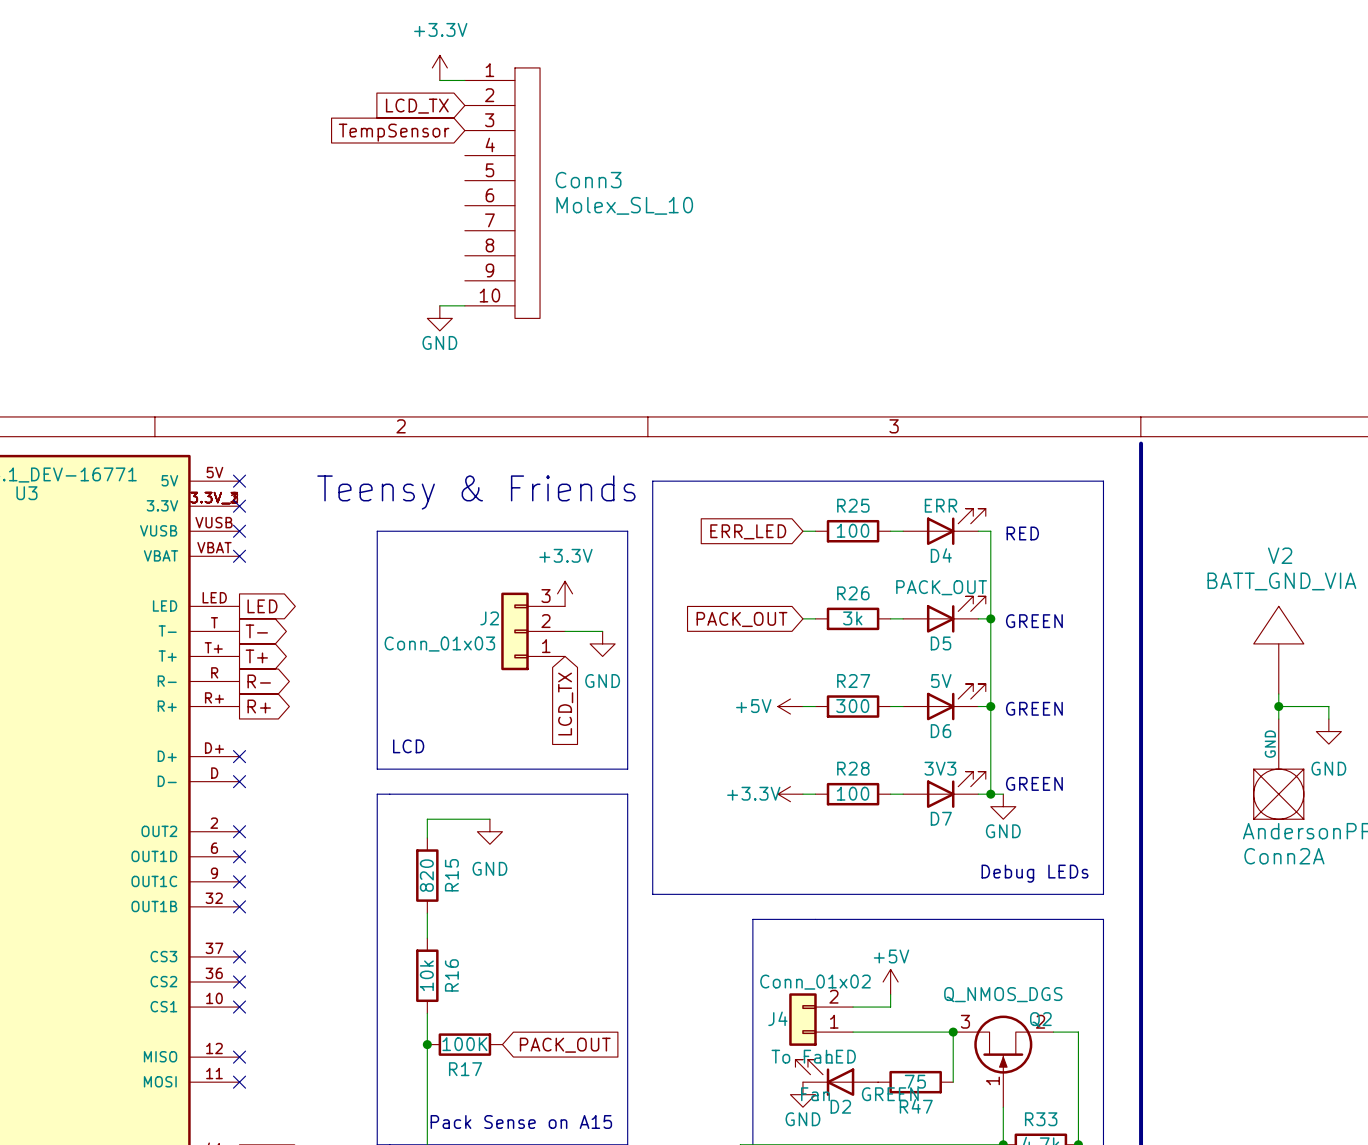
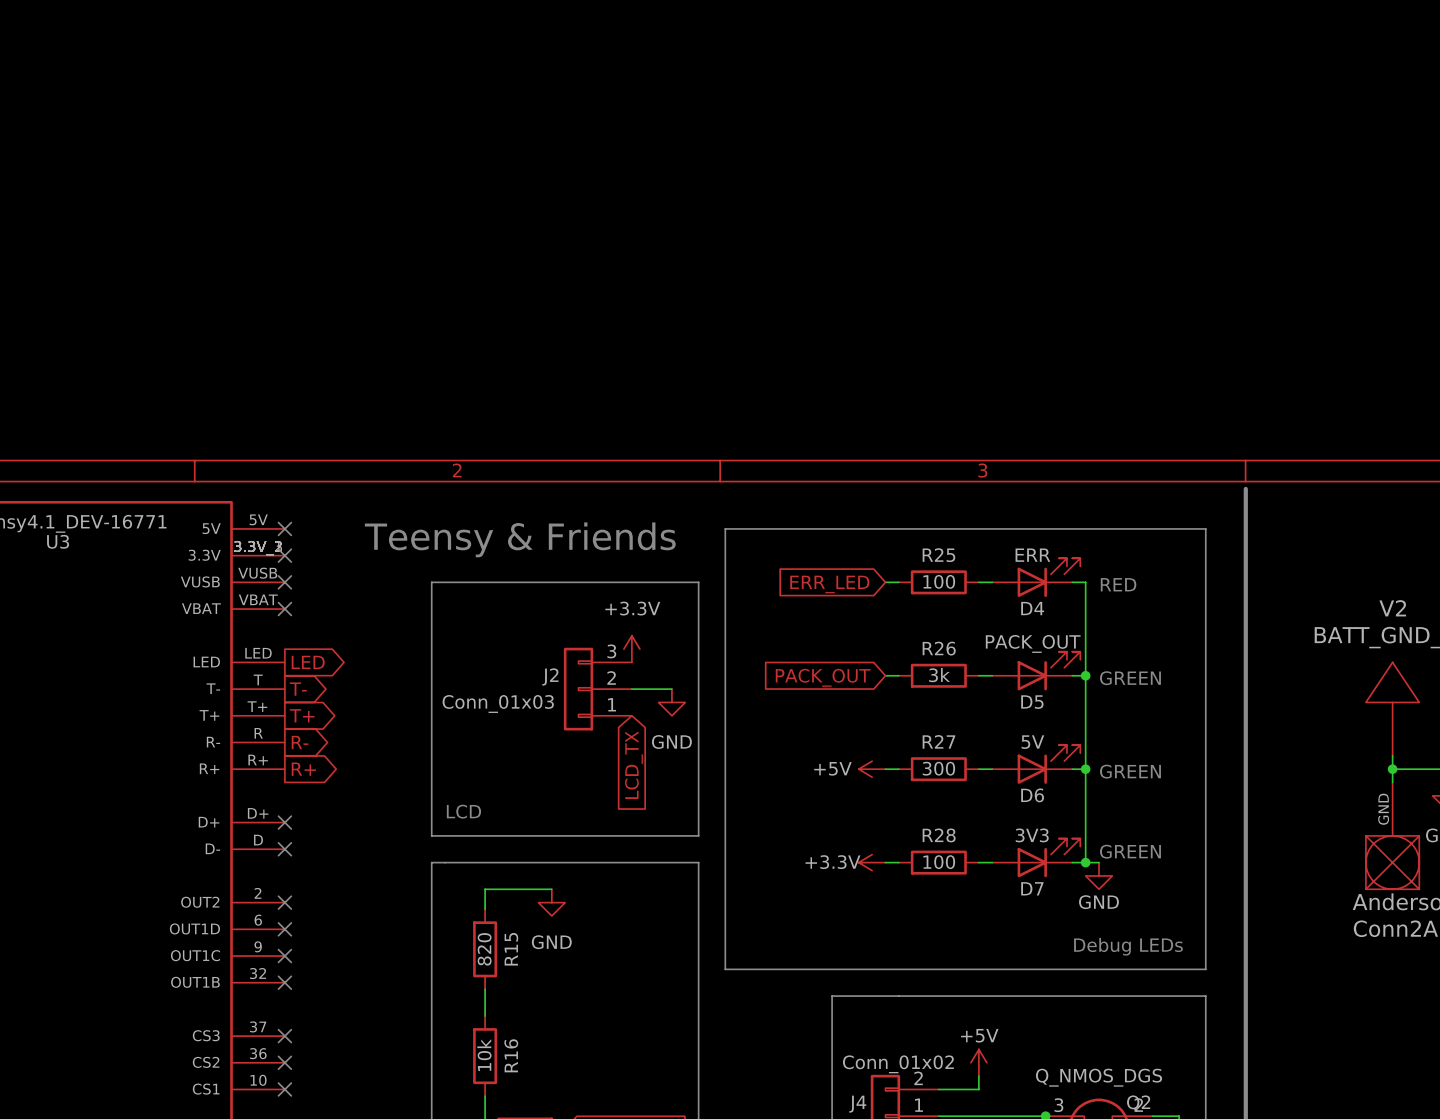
power symbol: +3.3V (439, 67) -> none
wire: (439, 80) (464, 80) -> none
global label: LCD_TX (417, 106) -> none
global label: TempSensor (394, 132) -> none
Conn3: Molex_SL_10 (502, 193) -> none
wire: (439, 305) (464, 305) -> none
power symbol: GND (439, 318) -> none

